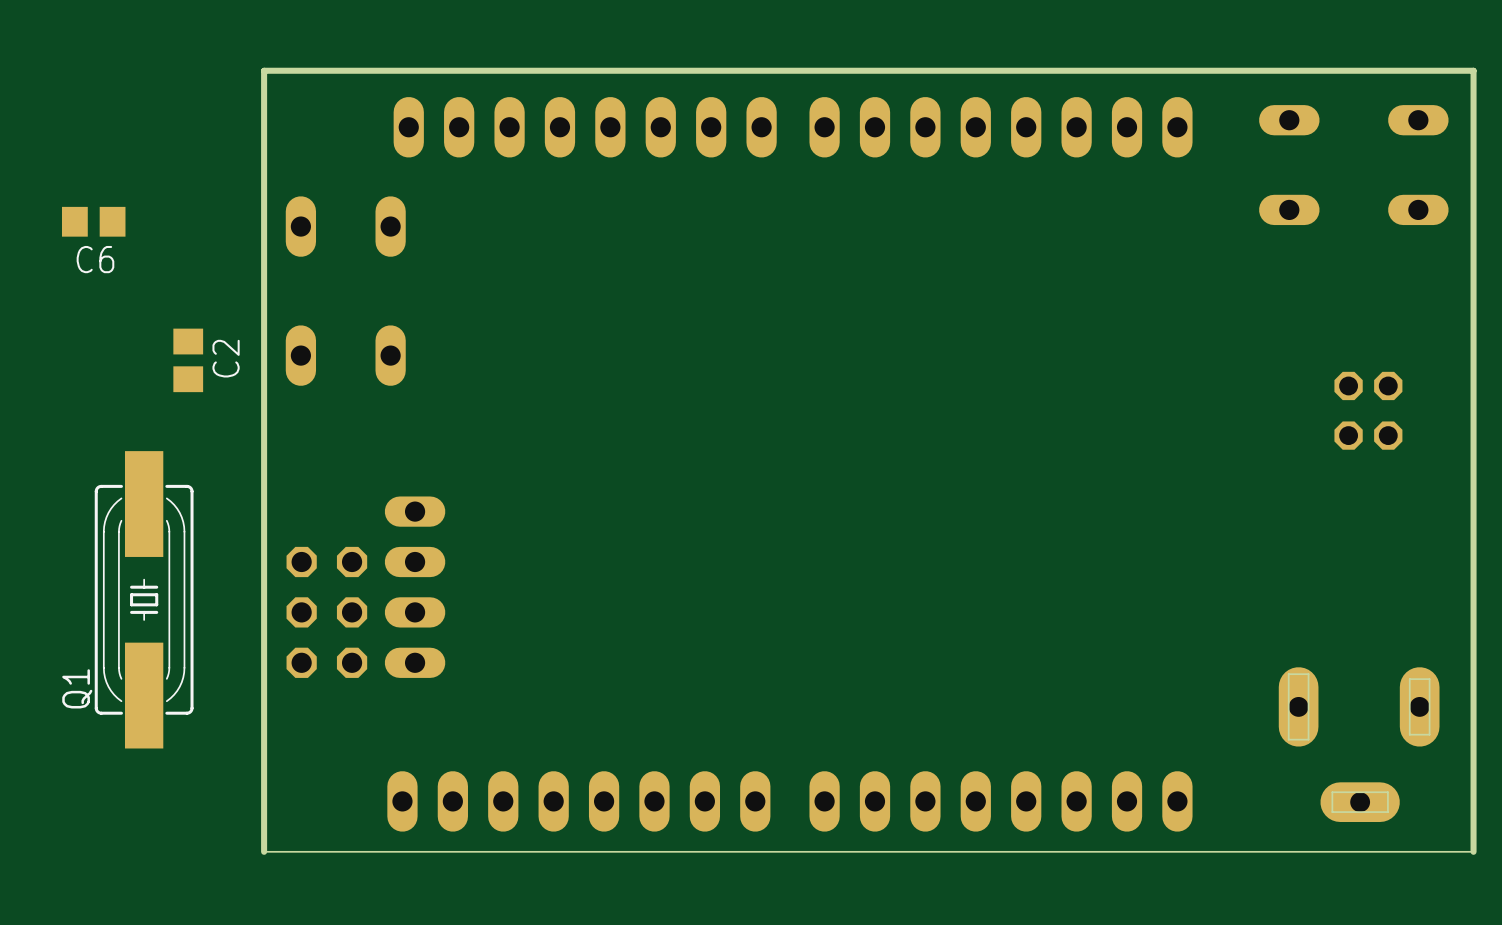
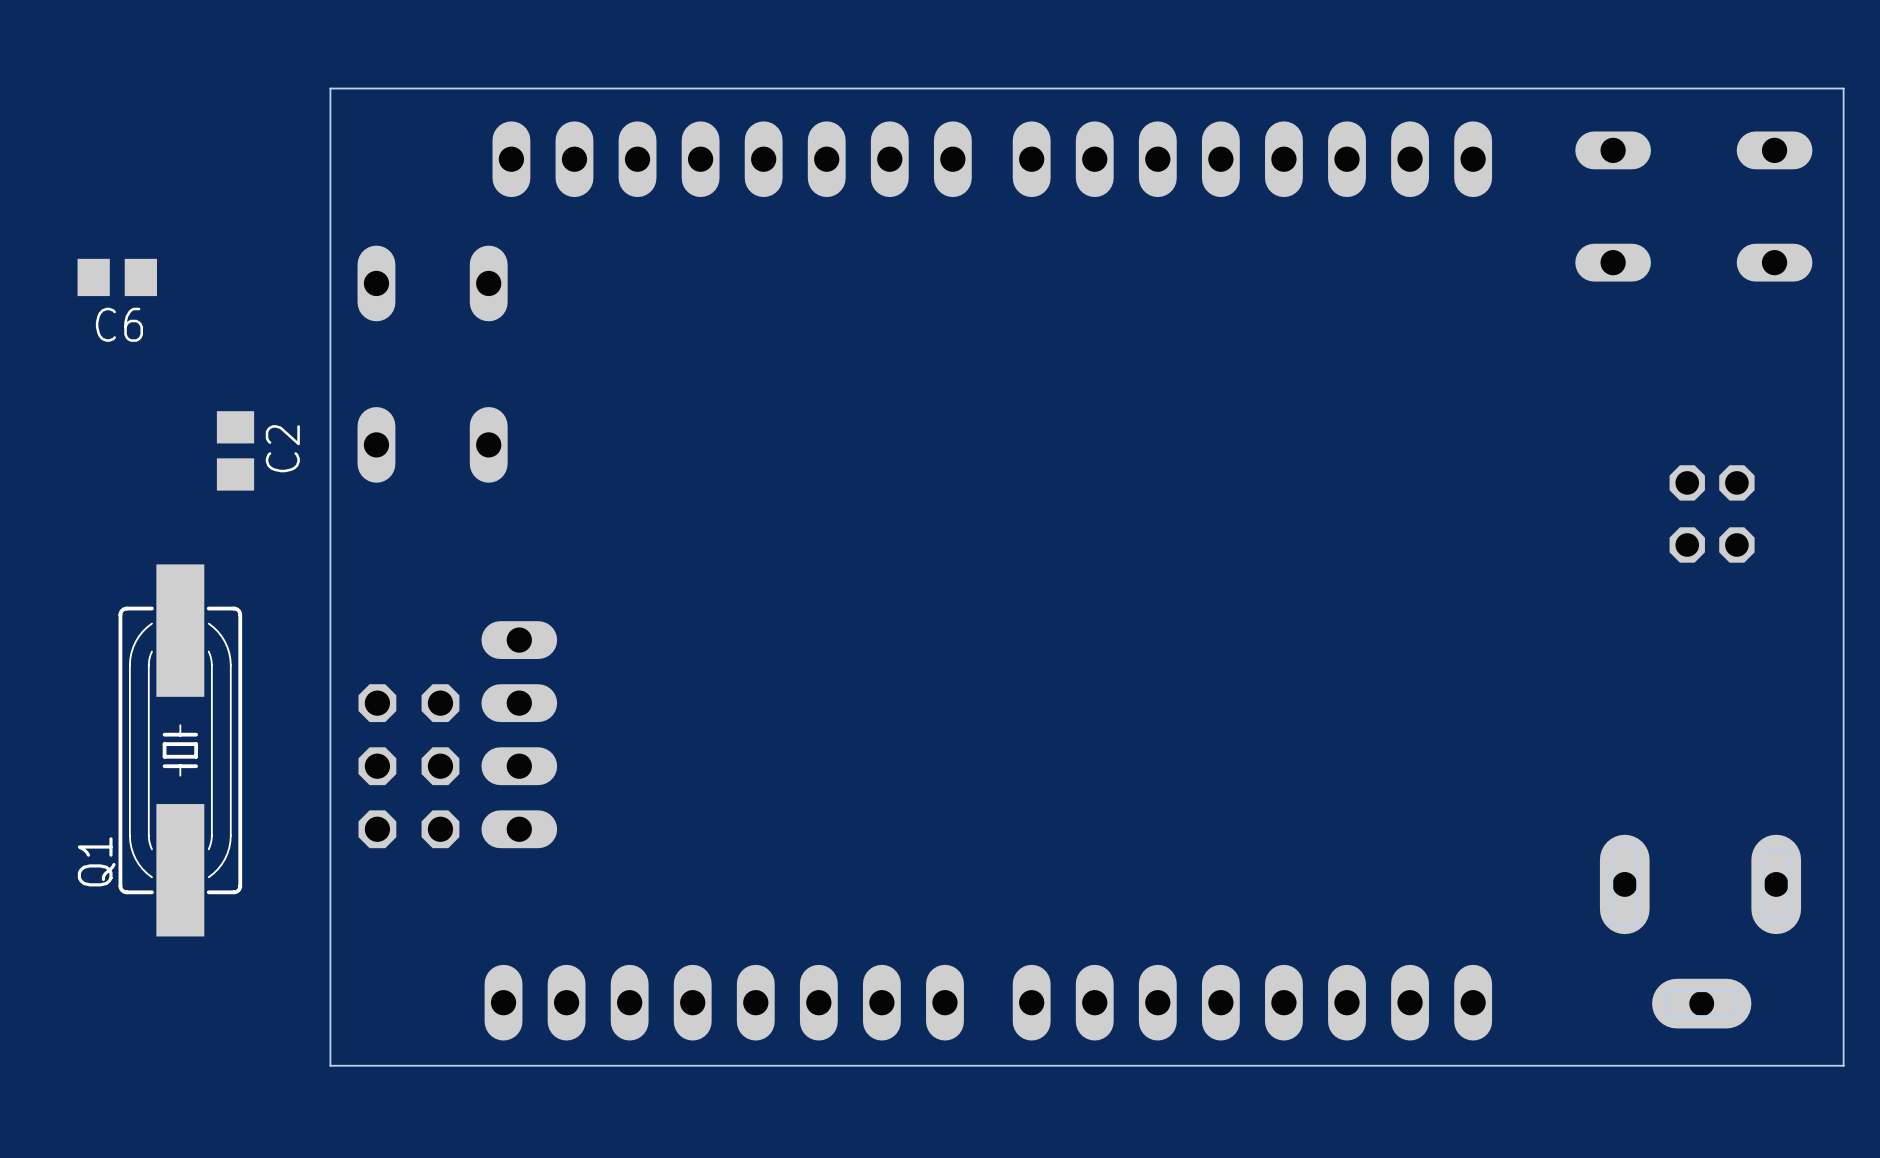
board edge width: thick (1473, 851) (1473, 70) (264, 70) (264, 851) -> thin (1843, 1065) (1843, 88) (330, 88) (330, 1065)

